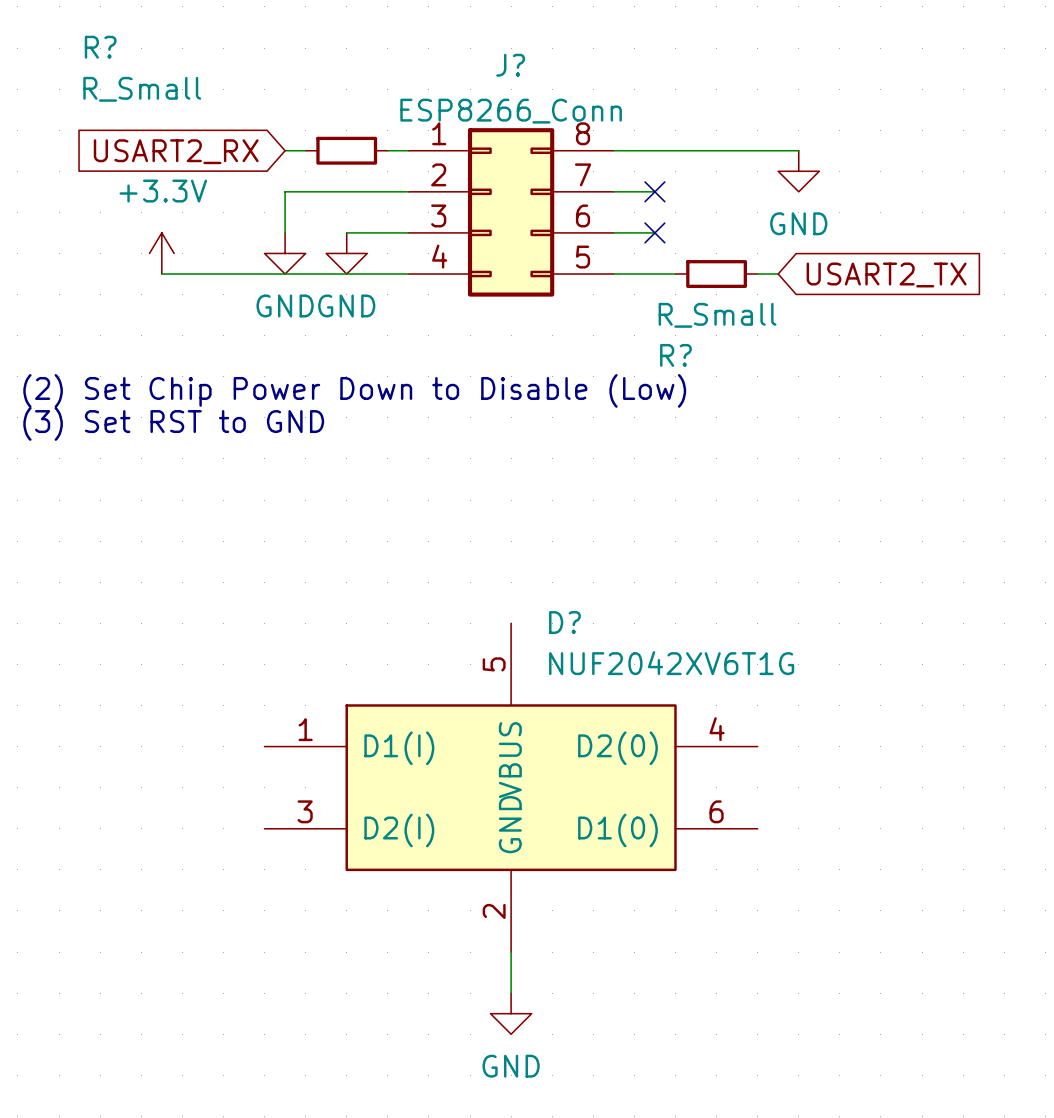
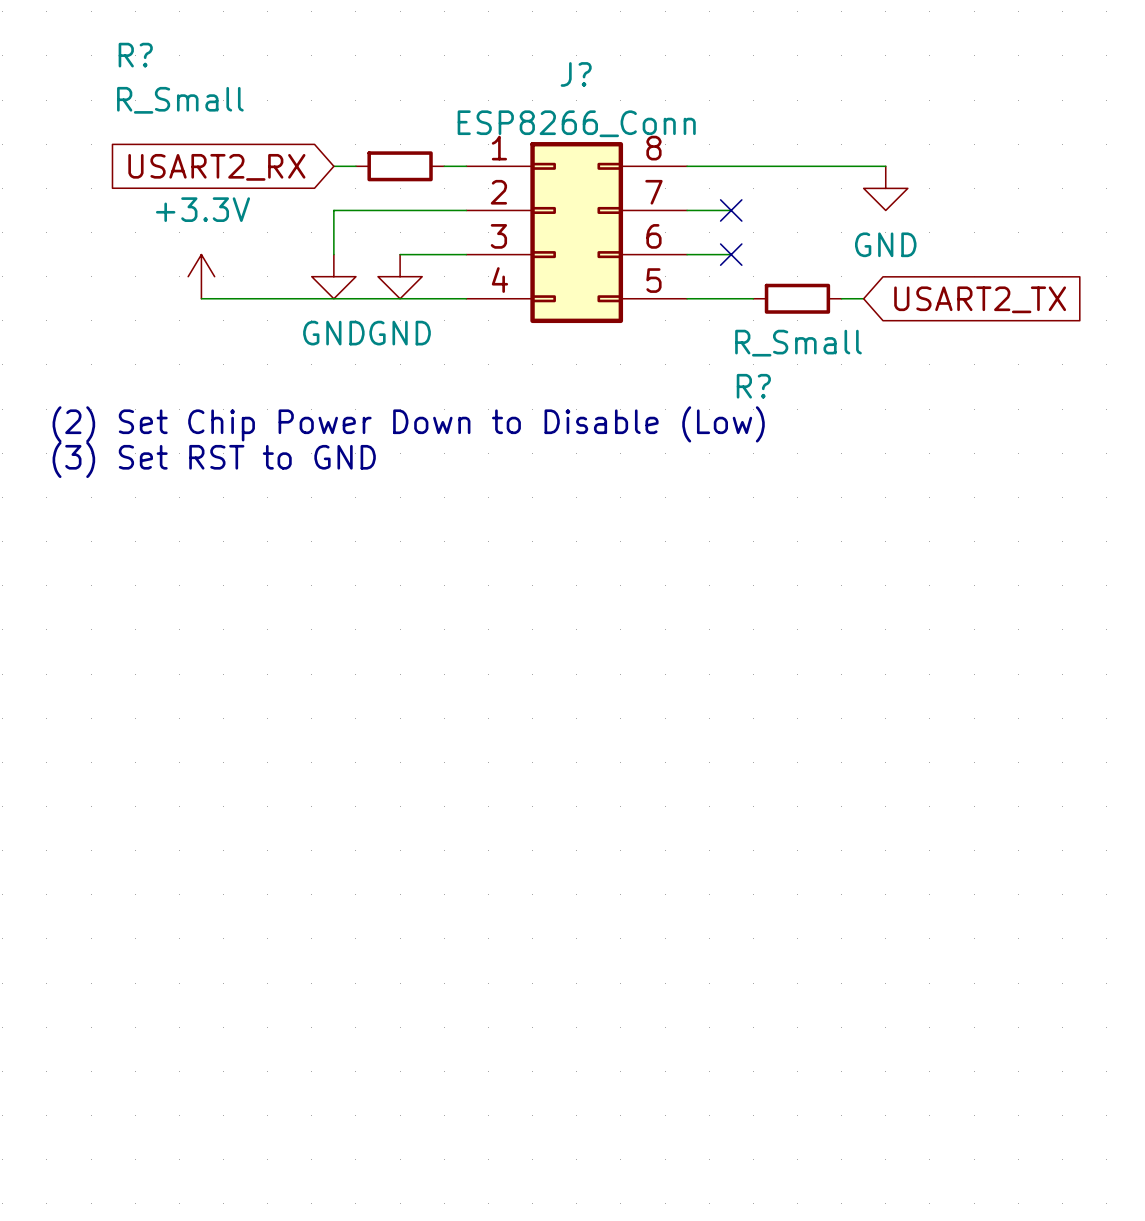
D?: NUF2042XV6T1G (511, 787) -> none
wire: (511, 952) (511, 993) -> none
power symbol: GND (511, 1013) -> none

